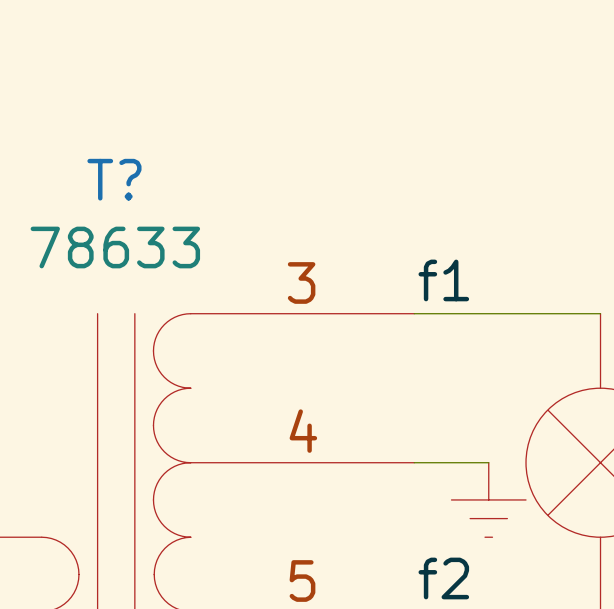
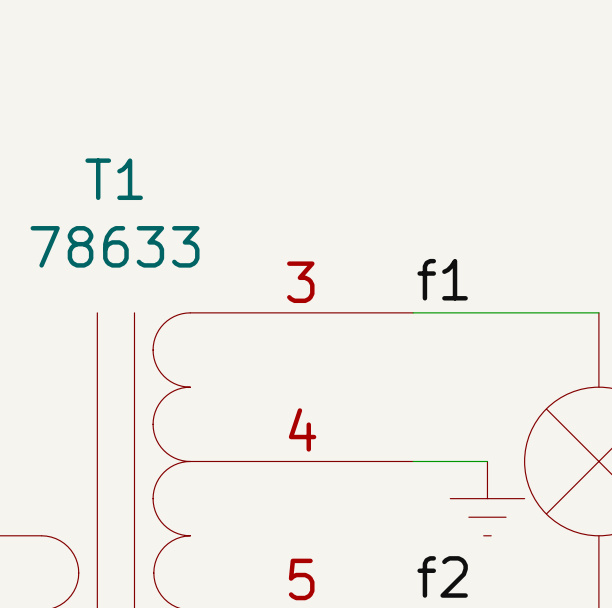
T? name: T? (114, 179) -> T1 (114, 179)

